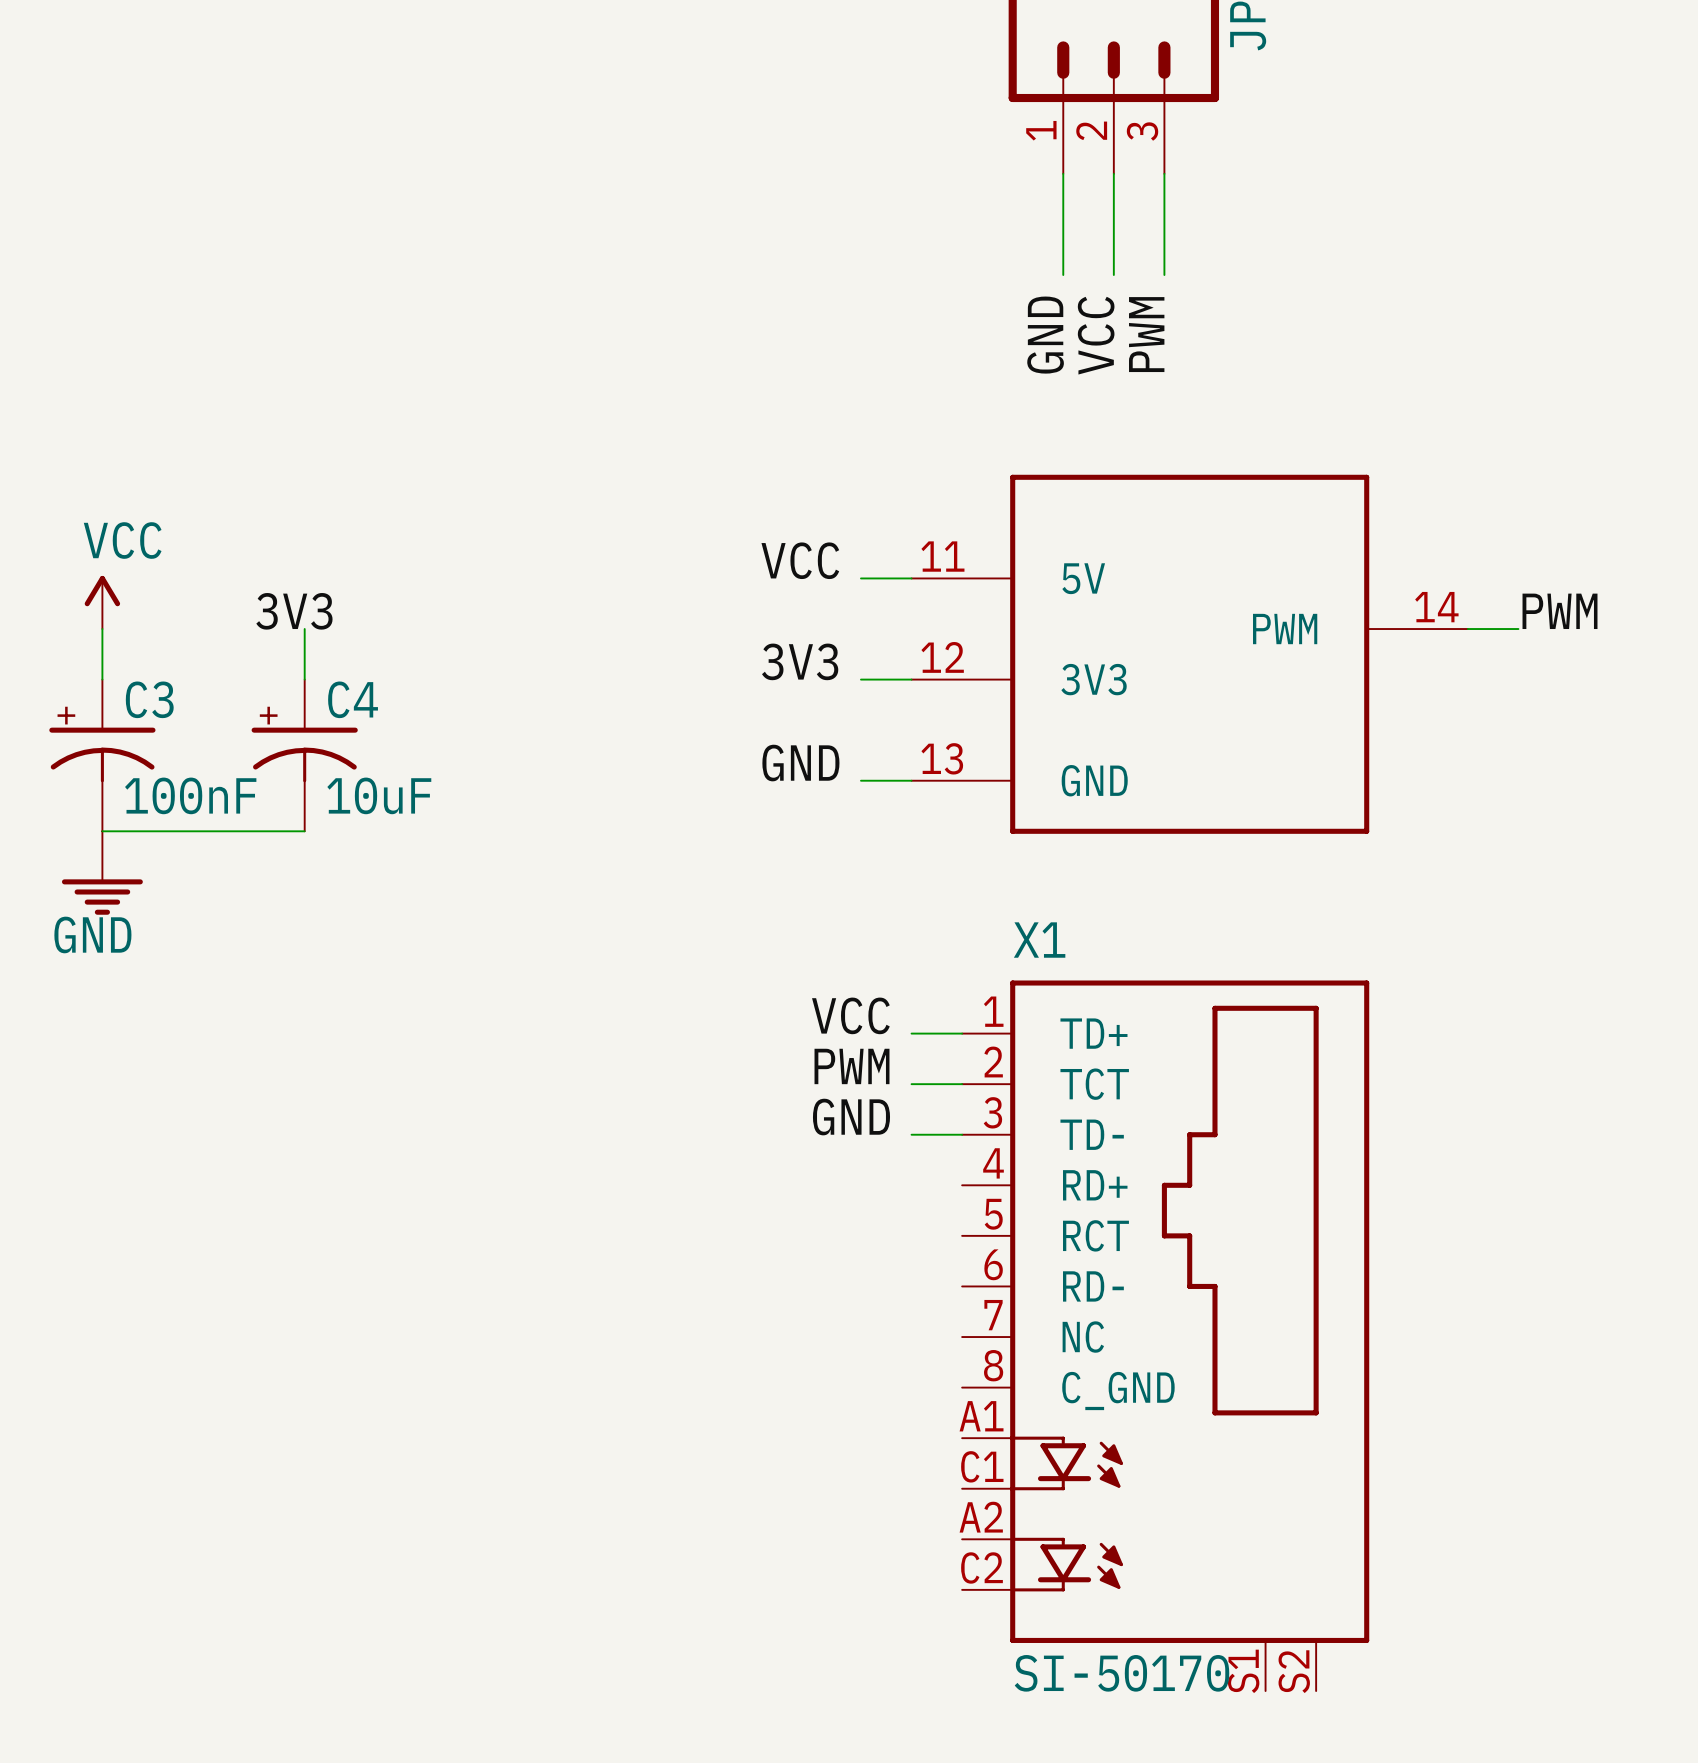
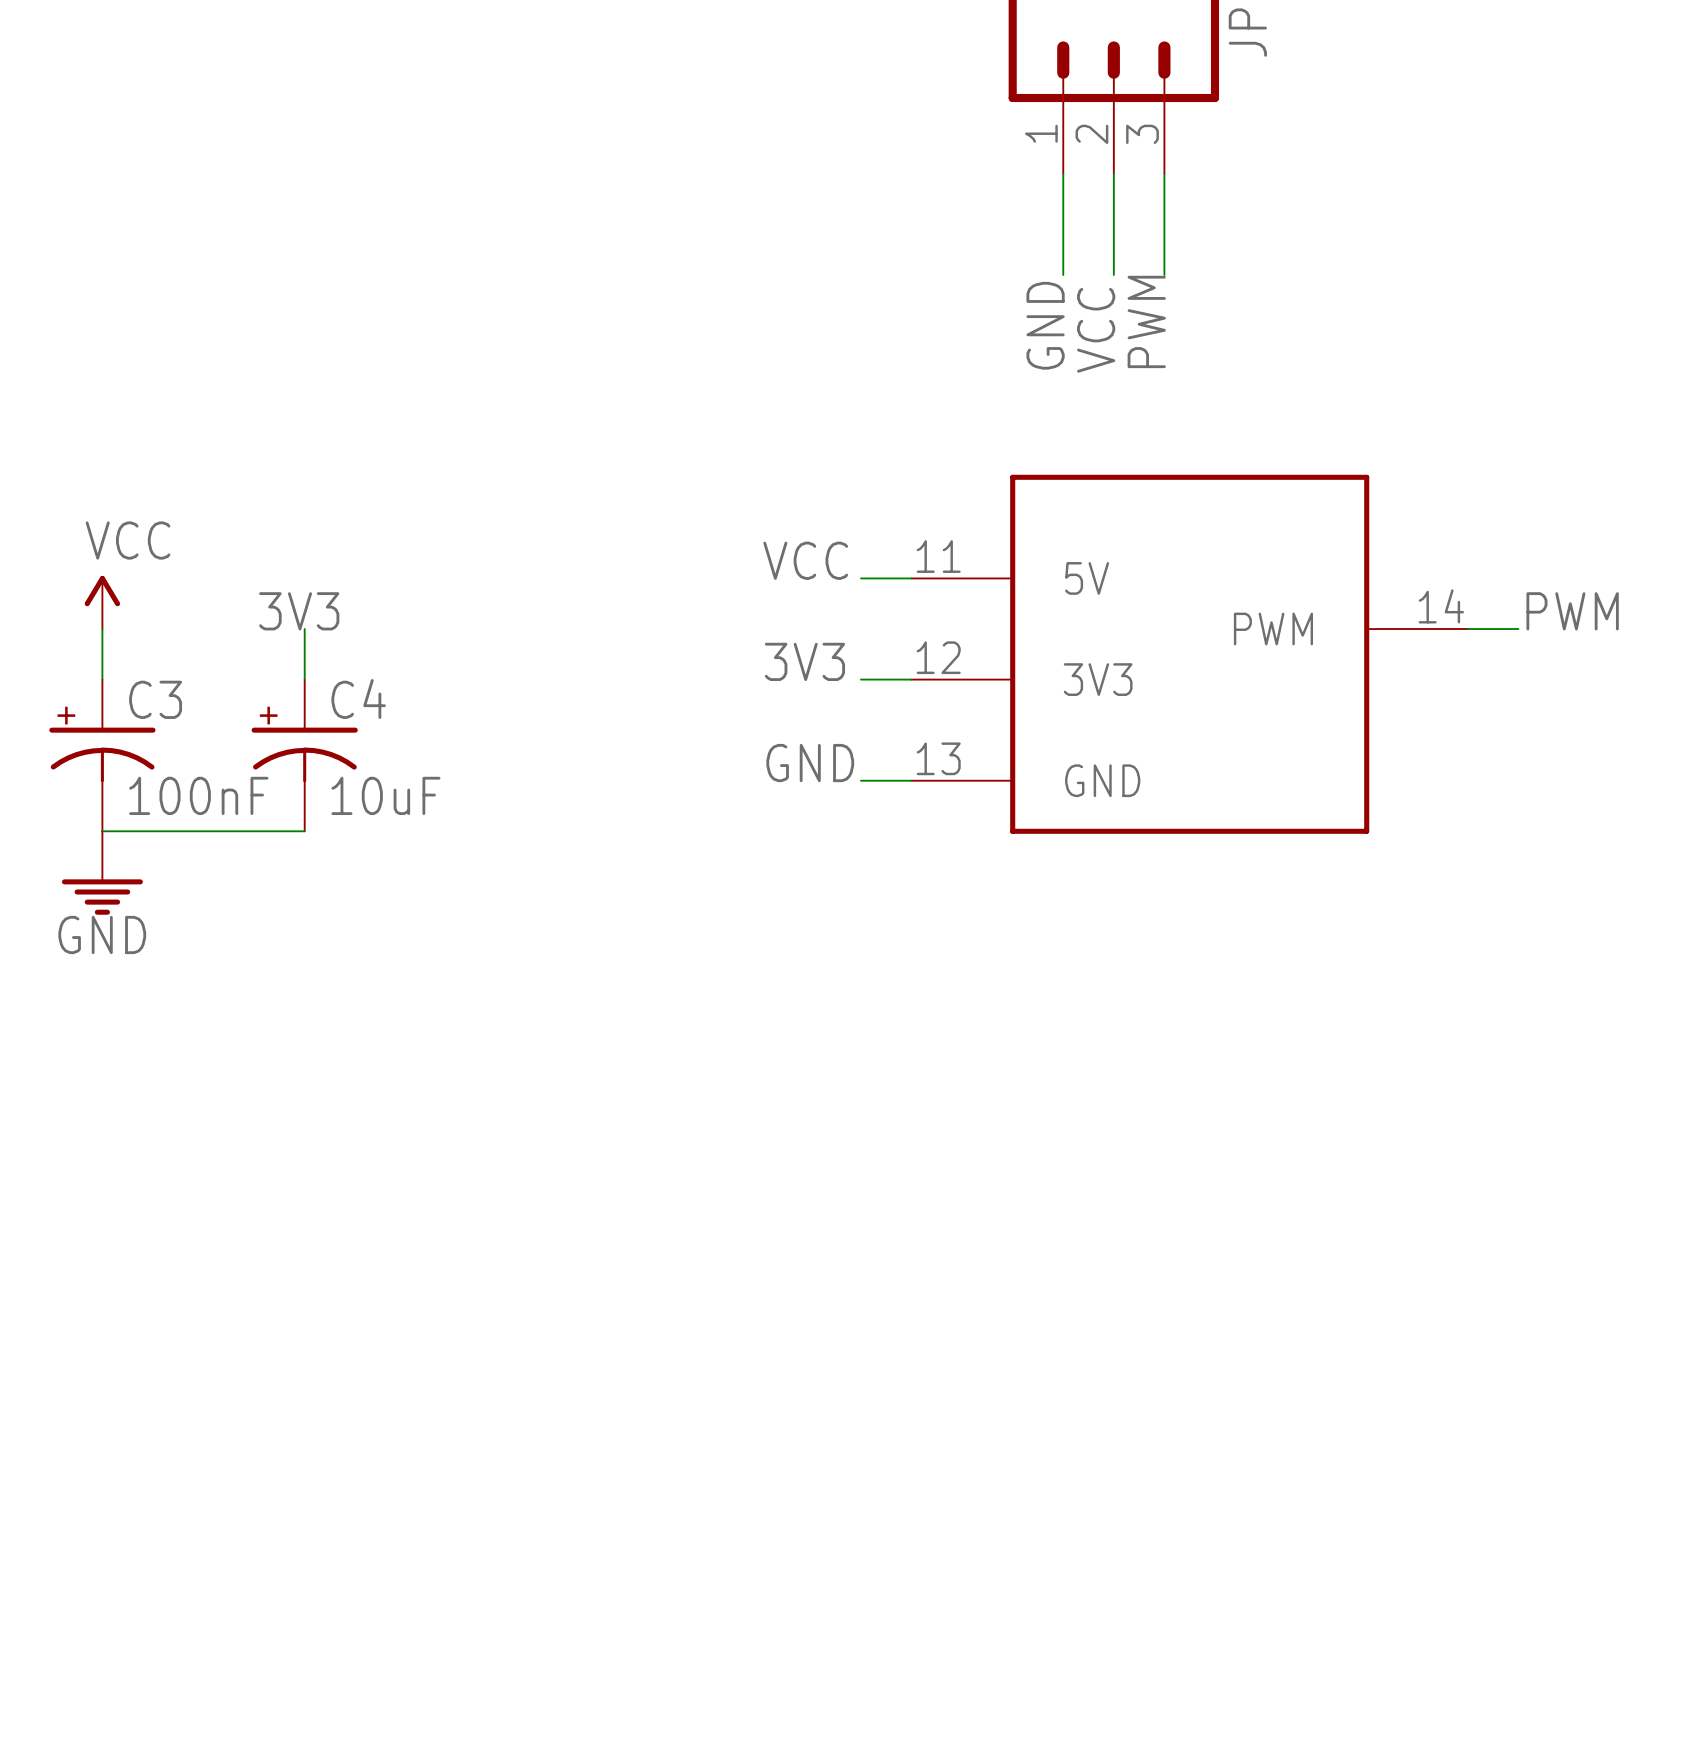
label: VCC (850, 1015) -> none
wire: (911, 1033) (962, 1033) -> none
label: PWM (851, 1066) -> none
wire: (911, 1084) (962, 1084) -> none
label: GND (851, 1117) -> none
wire: (911, 1134) (962, 1134) -> none
X1: SI-50170 (1165, 1335) -> none

